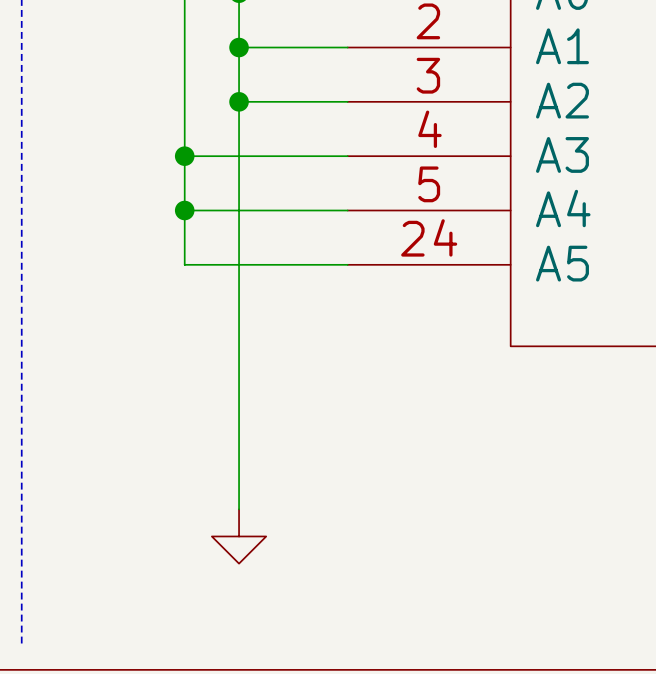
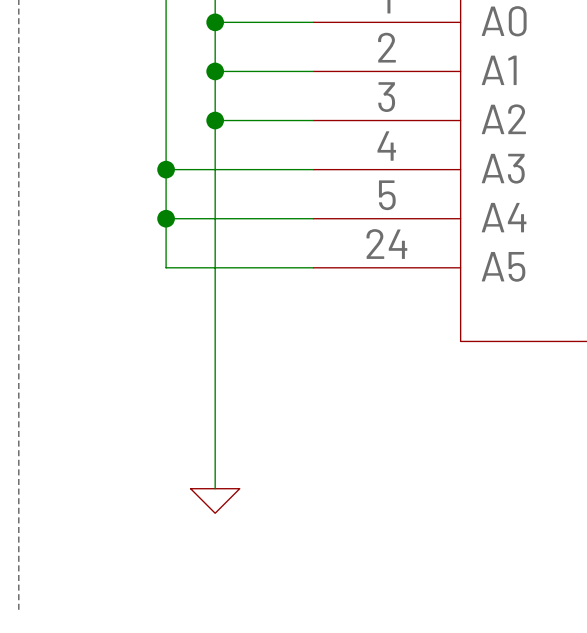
power symbol shape: [211, 509, 267, 564] -> [190, 488, 240, 514]

